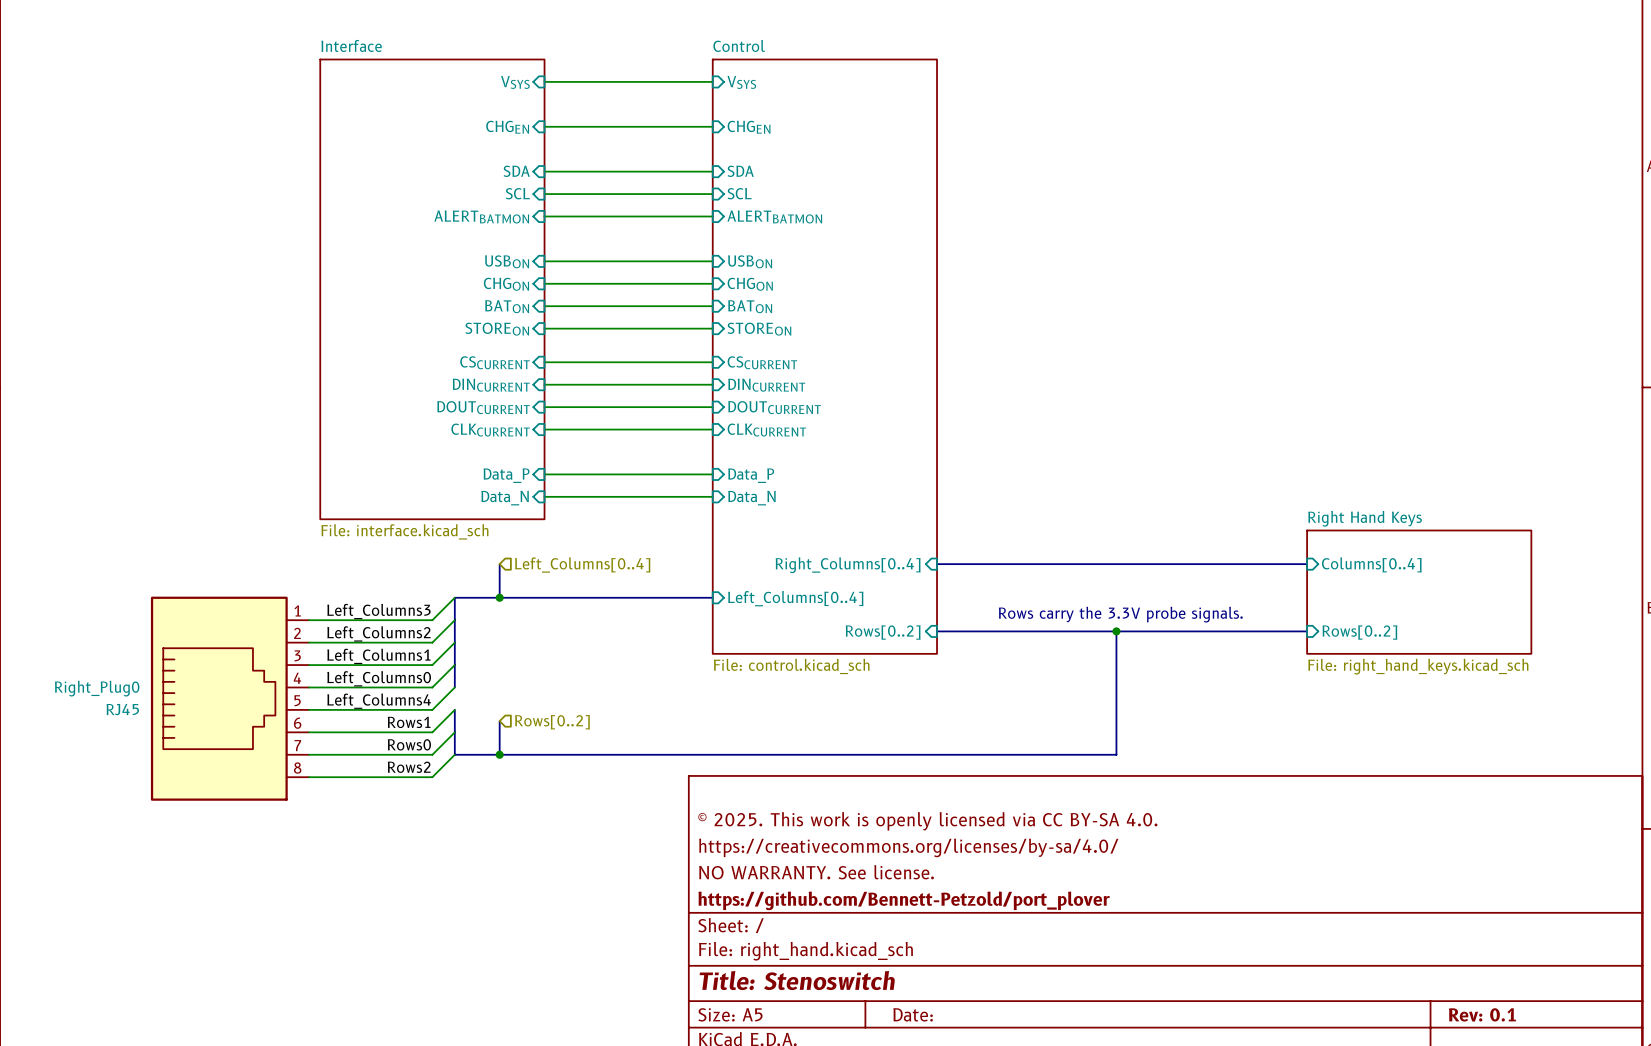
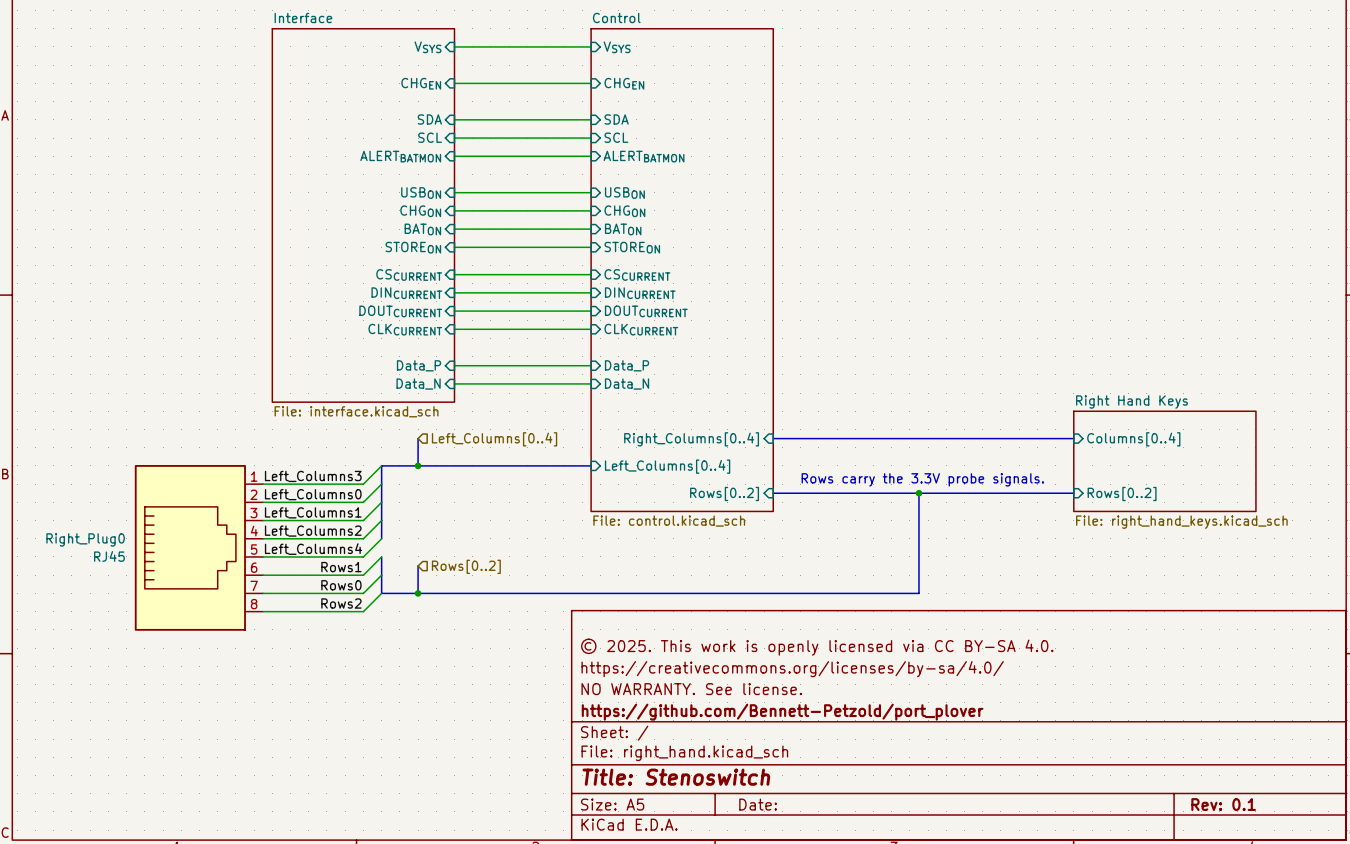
label: Left_Columns2 (378, 633) -> Left_Columns0 (313, 494)
label: Left_Columns0 (379, 678) -> Left_Columns2 (313, 531)

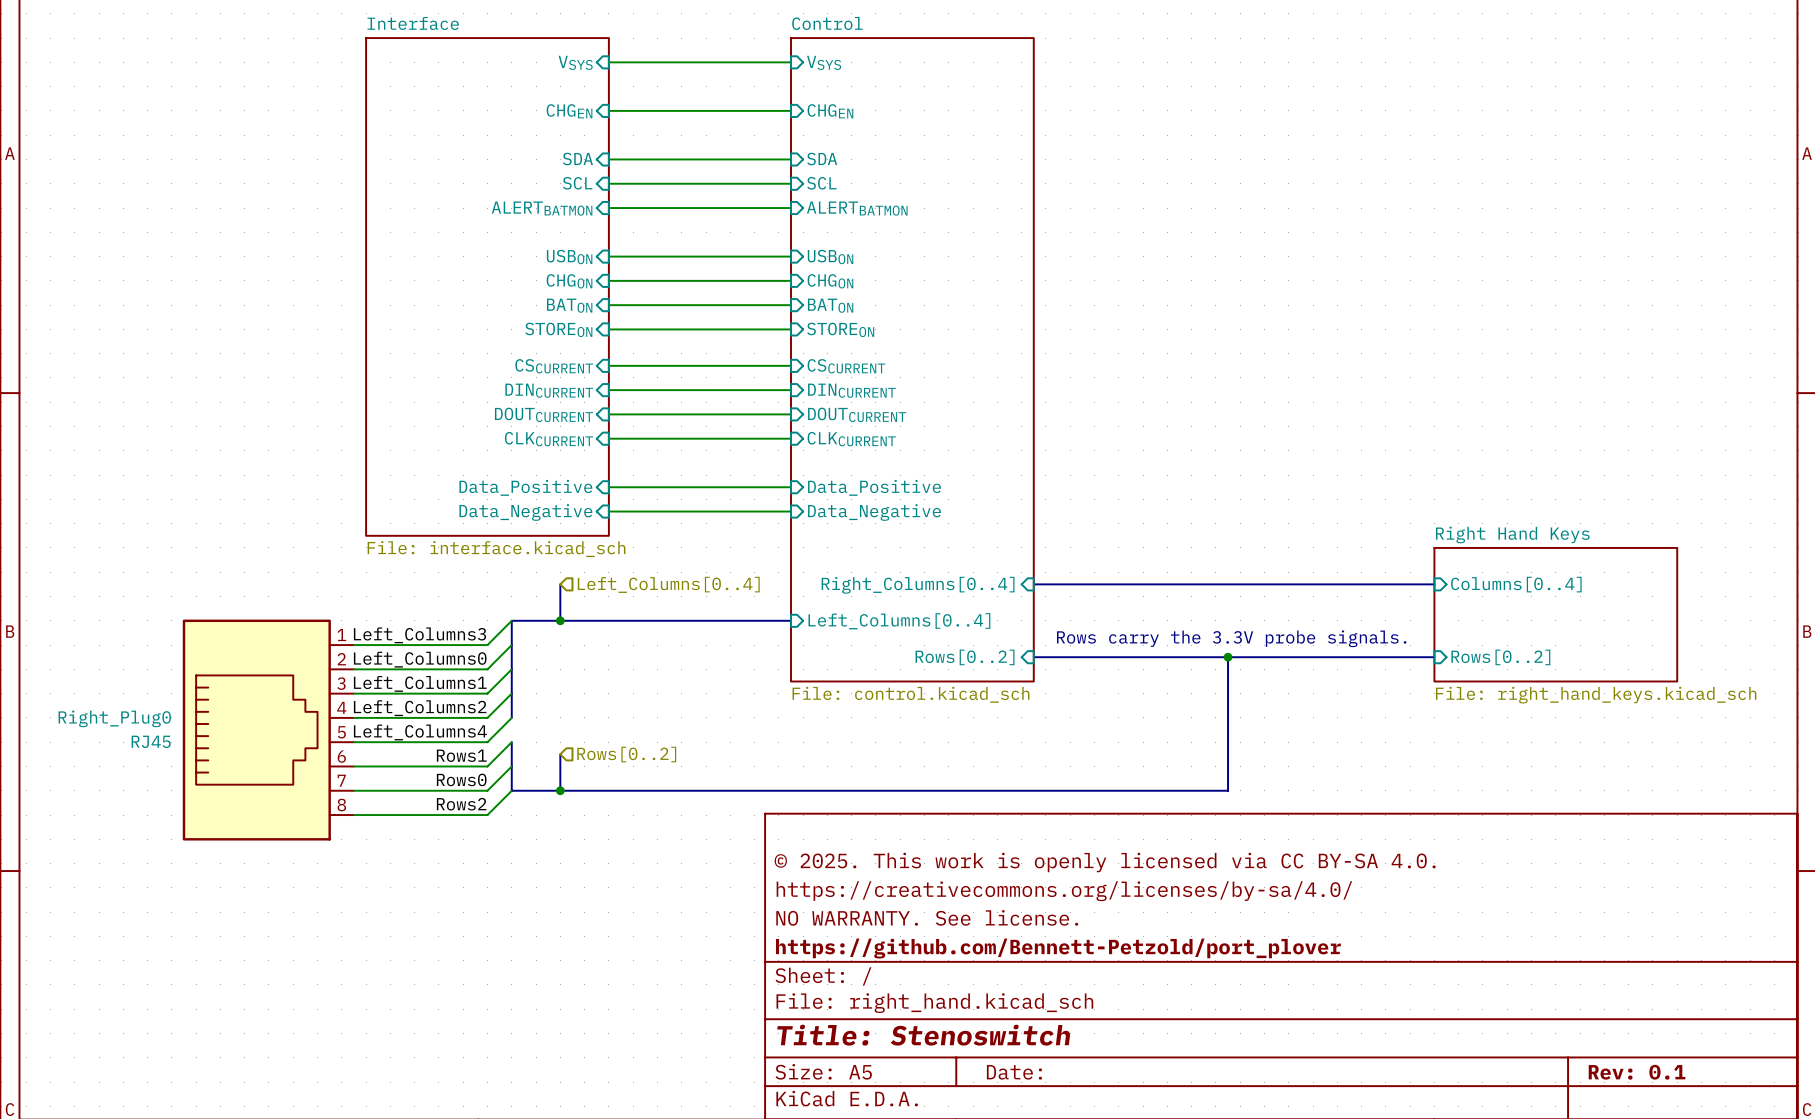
sheet pin: Data_P (419, 365) -> Data_Positive (525, 487)
sheet pin: Data_P (627, 365) -> Data_Positive (874, 487)
sheet pin: Data_N (418, 384) -> Data_Negative (525, 512)
sheet pin: Data_N (627, 384) -> Data_Negative (874, 512)

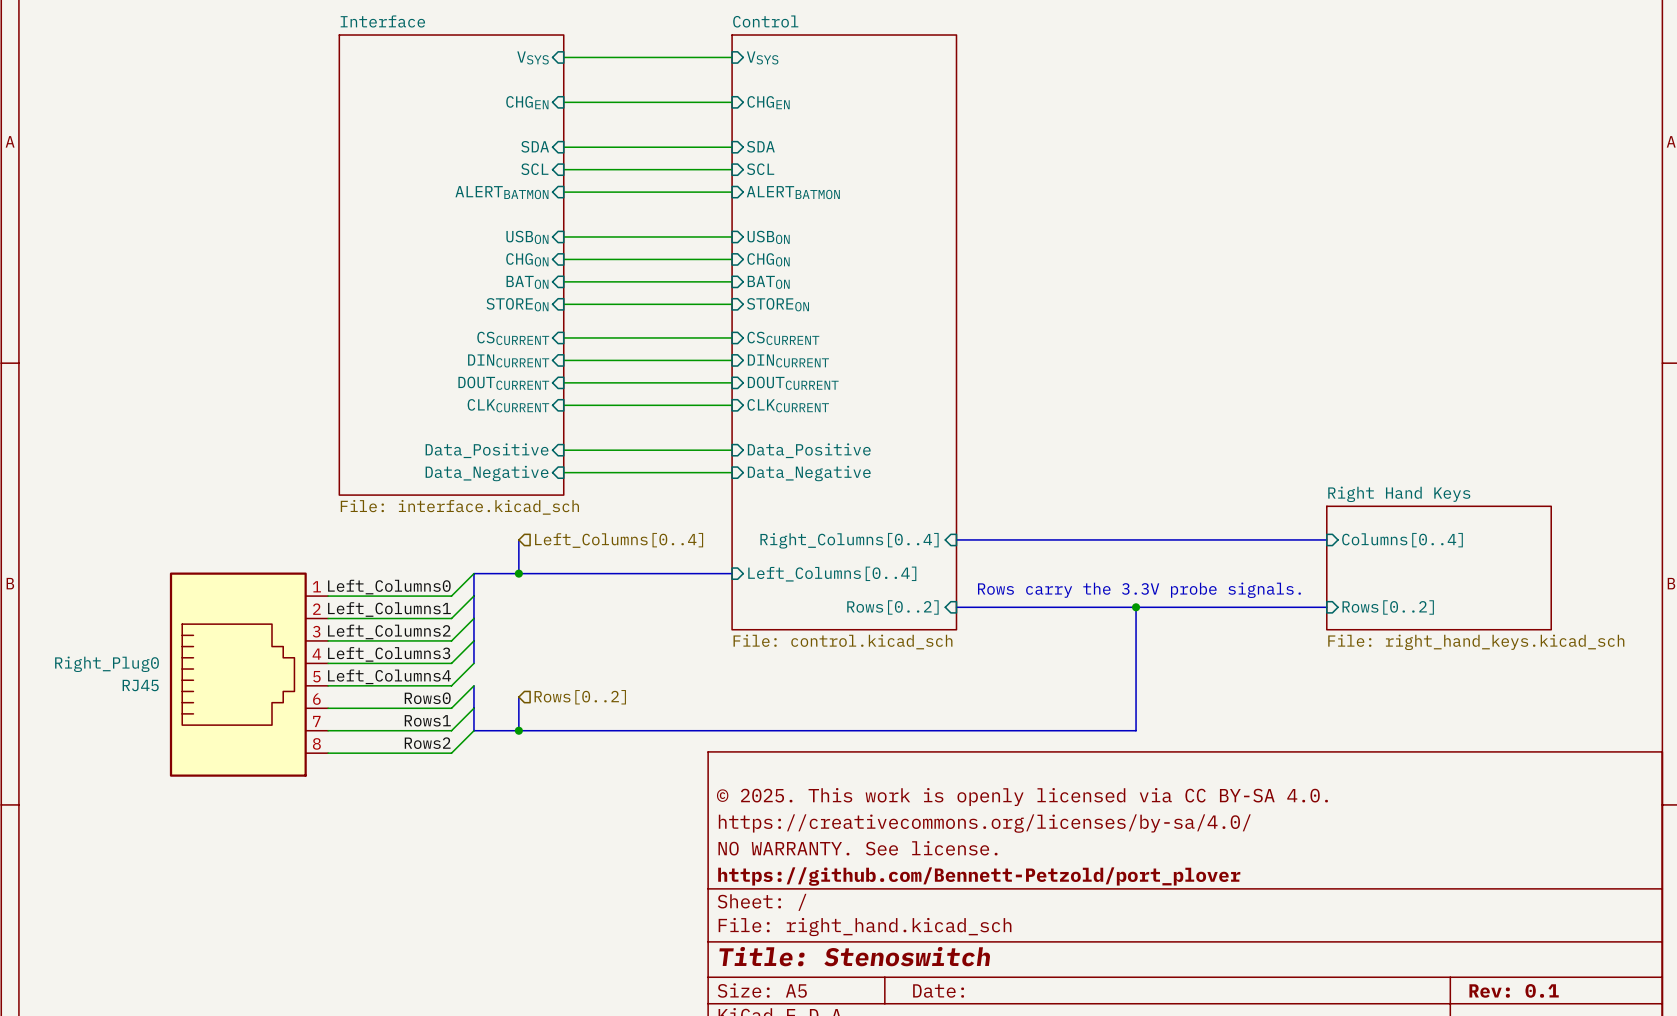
label: Left_Columns3 (419, 635) -> Left_Columns0 (389, 587)
label: Left_Columns0 (420, 659) -> Left_Columns1 (389, 609)
label: Left_Columns1 (420, 683) -> Left_Columns2 (389, 631)
label: Left_Columns2 (420, 708) -> Left_Columns3 (389, 654)
label: Rows1 (461, 755) -> Rows0 (427, 698)
label: Rows0 (461, 779) -> Rows1 (427, 720)

